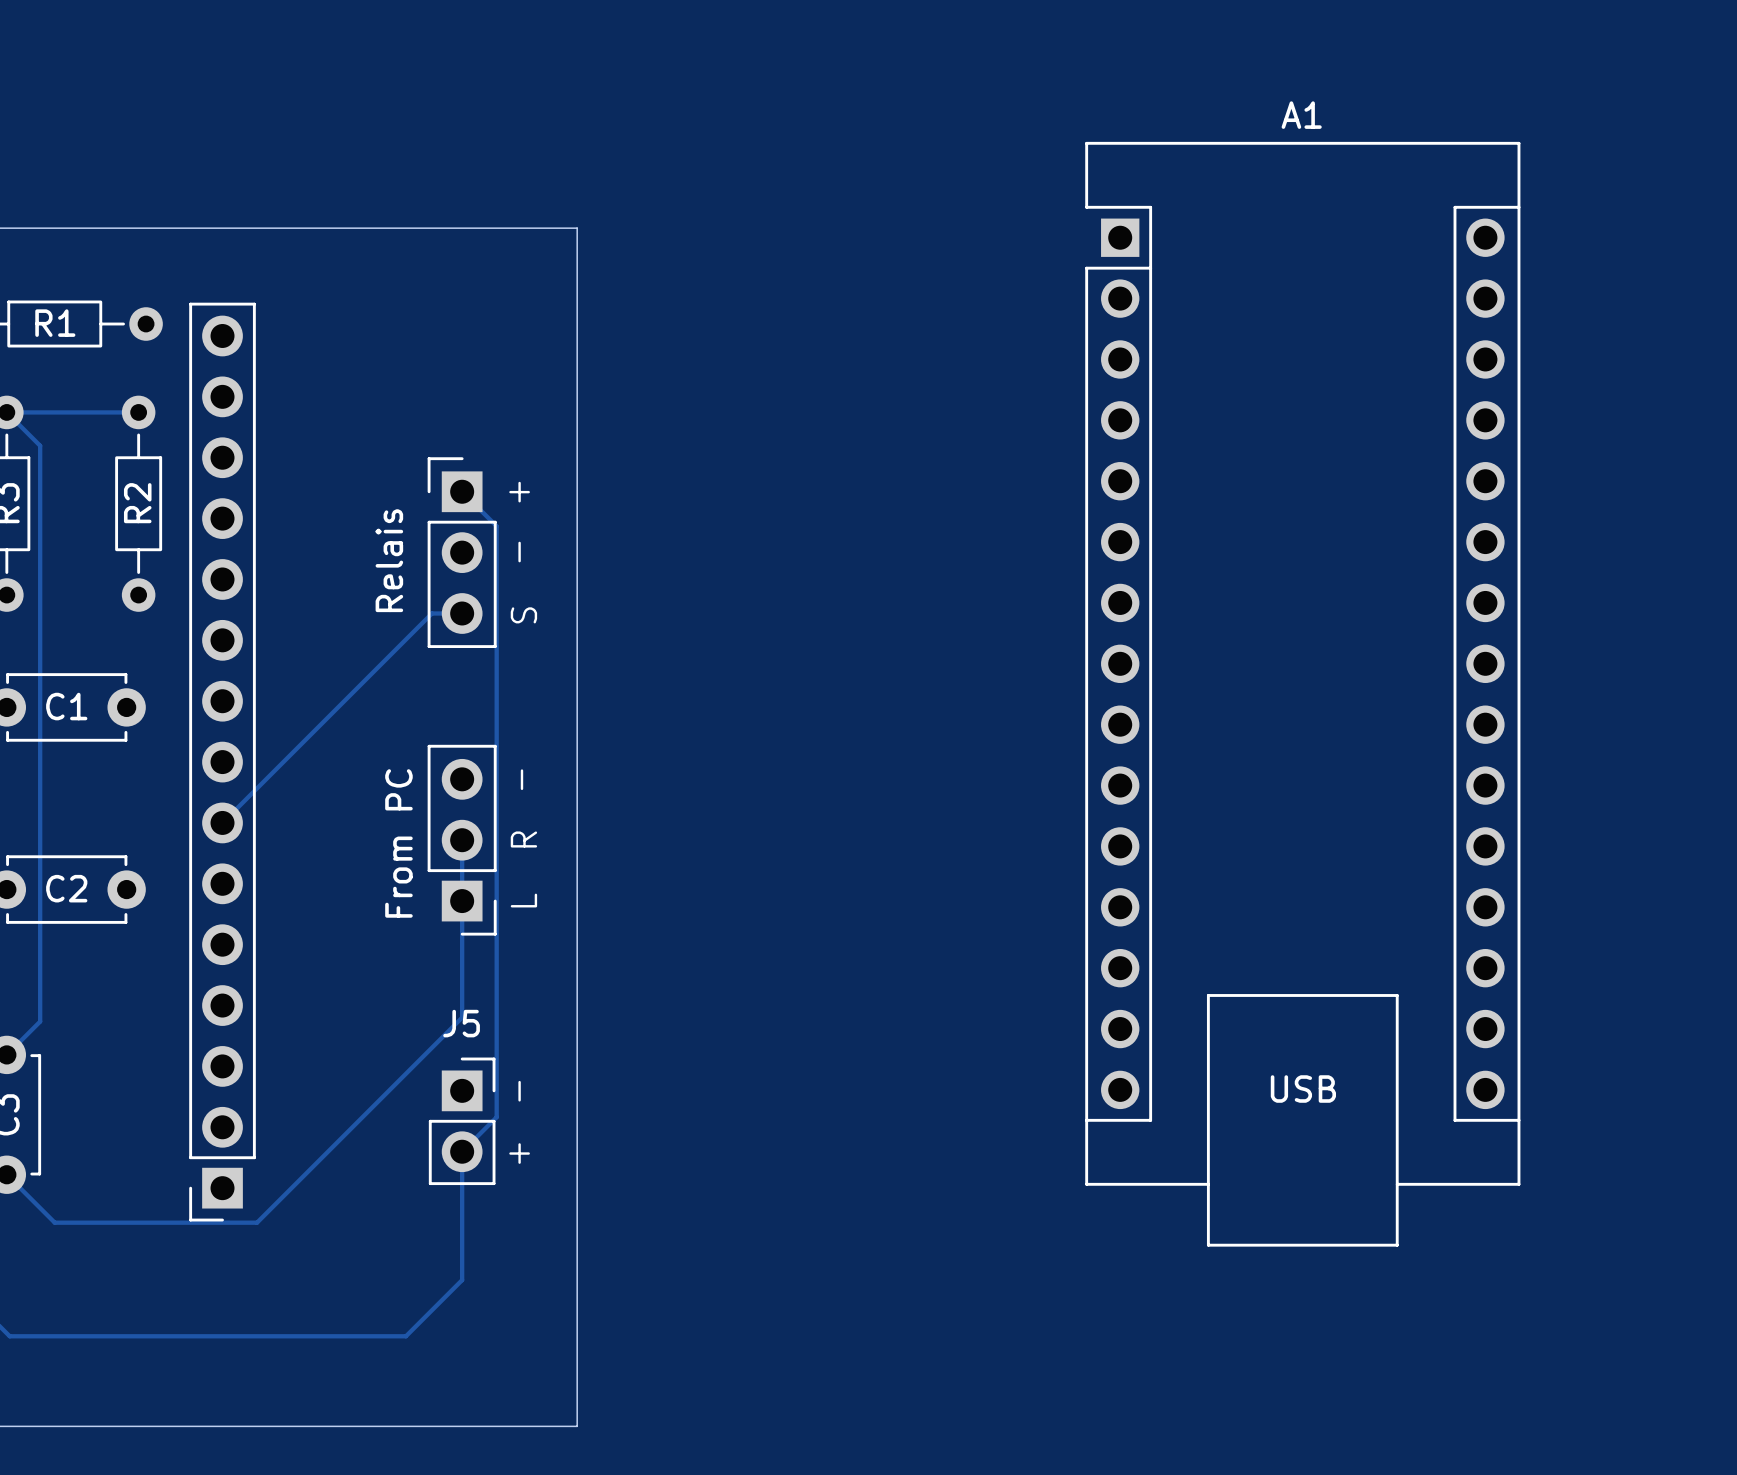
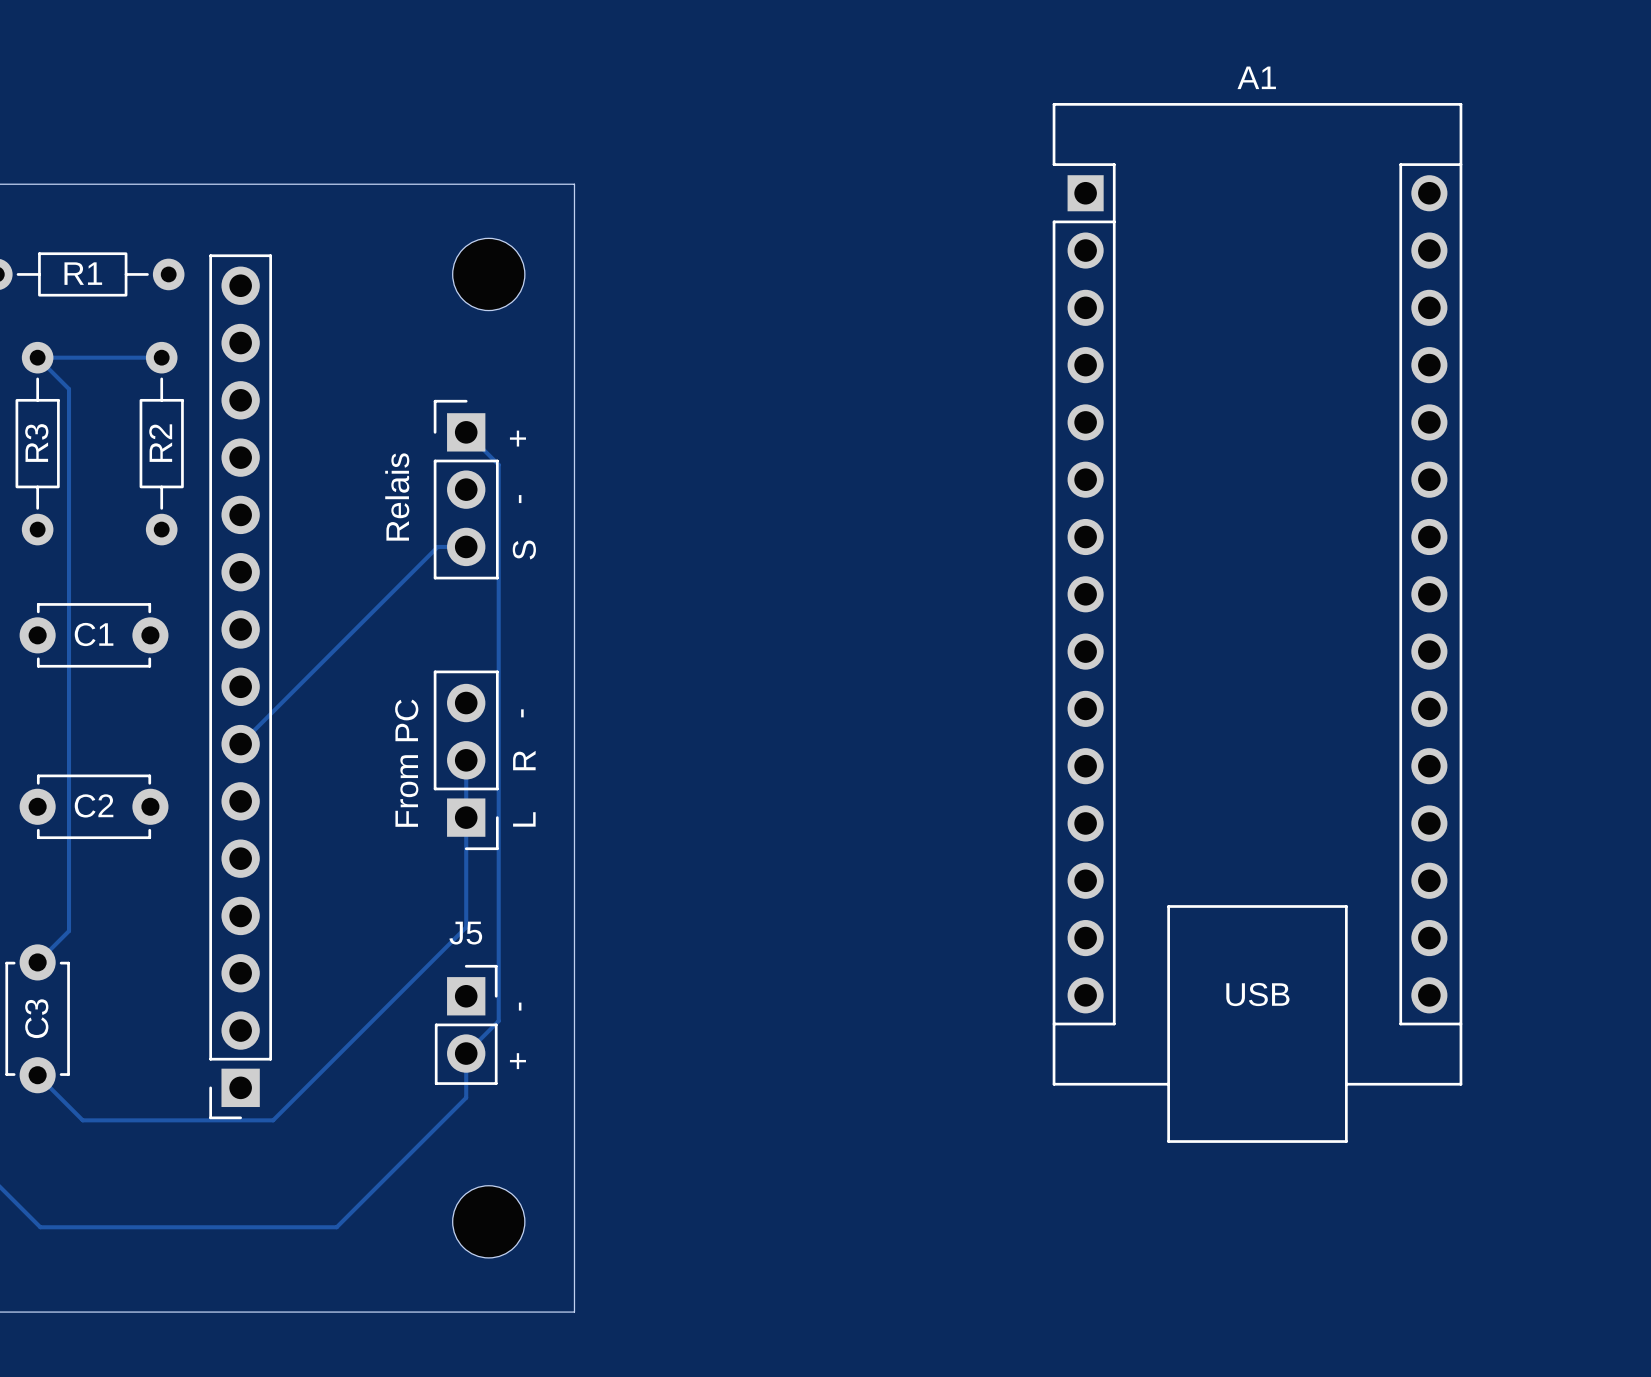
part: none -> (488, 274)
track: (462, 1198) (462, 1280) (405, 1336) (324, 1336) -> (466, 1097) (336, 1227)
part: none -> (488, 1221)

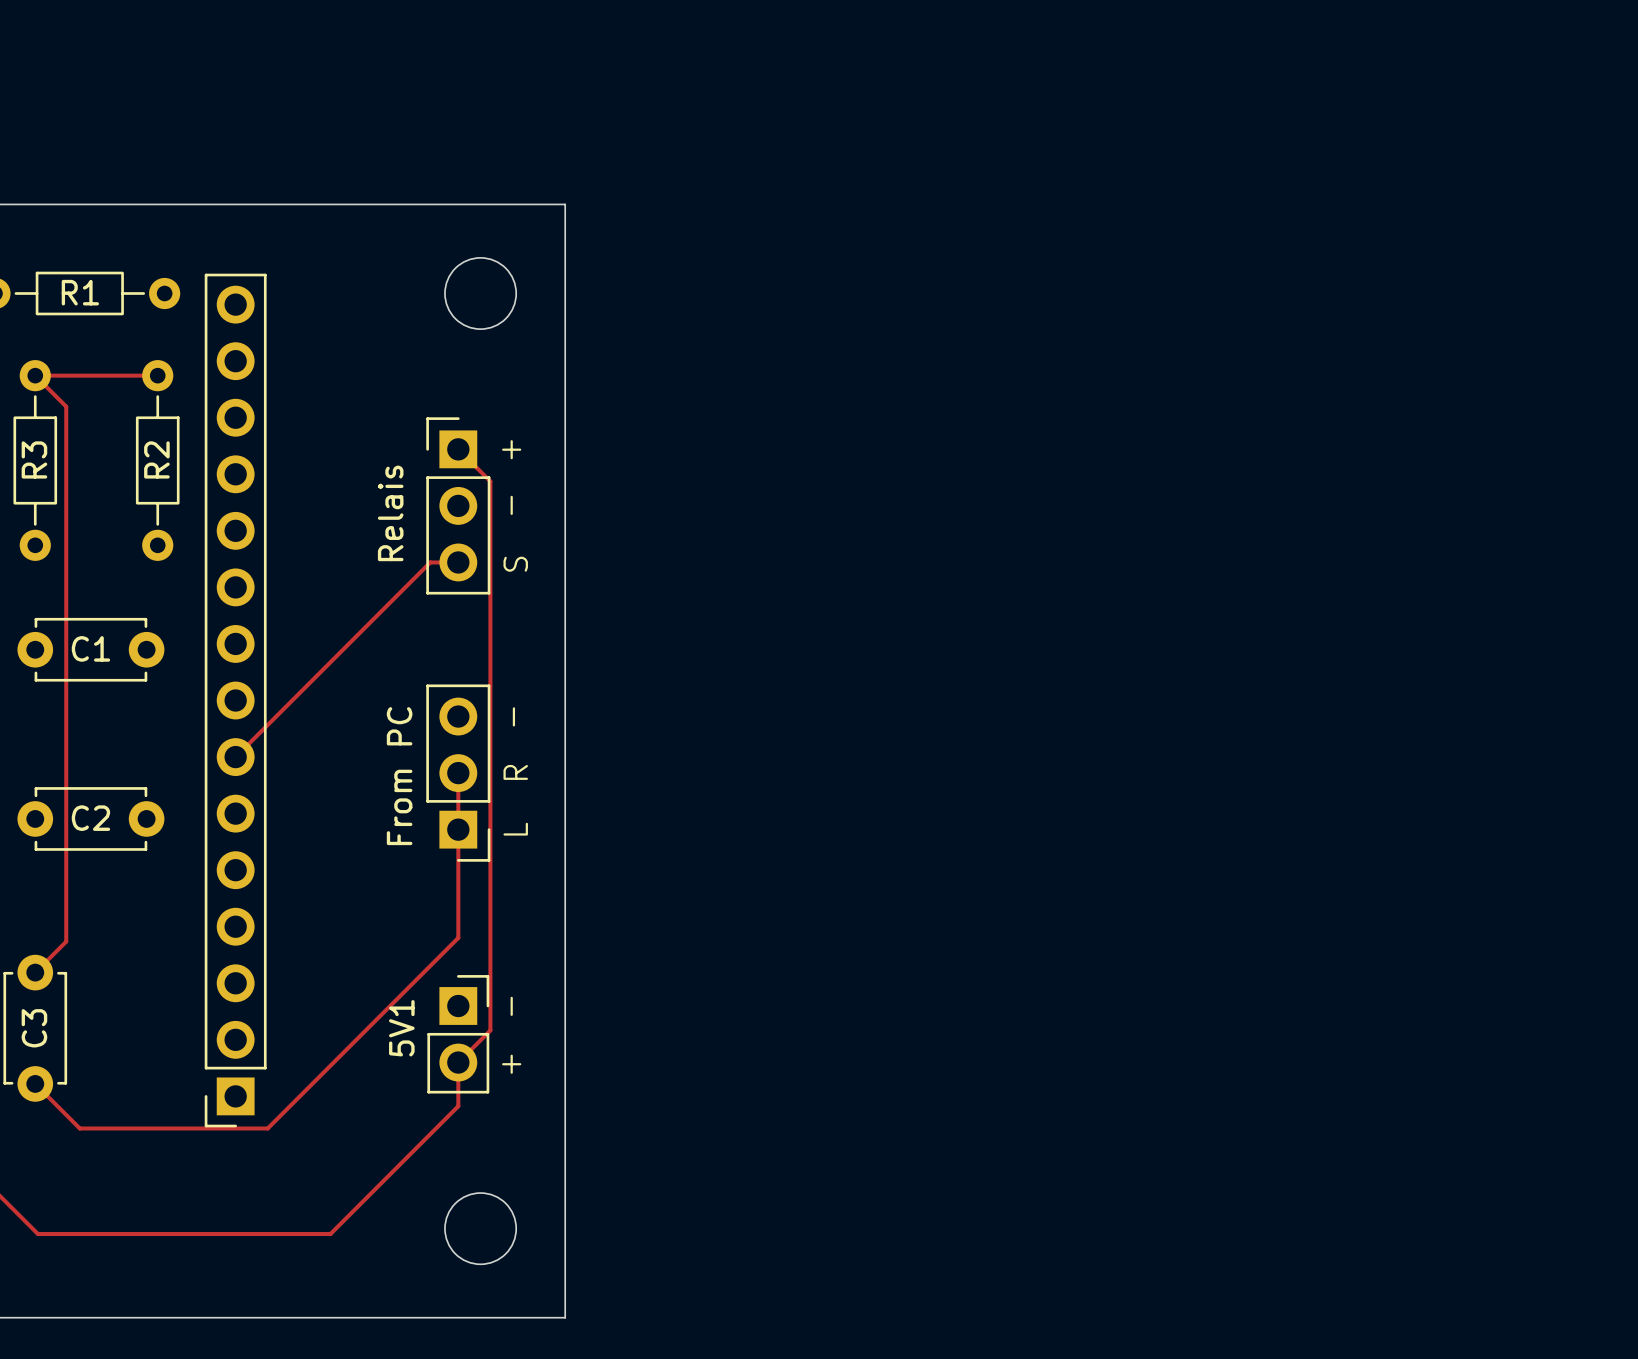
A1: (1257, 622) -> none
J5 name: J5 (465, 933) -> 5V1 (401, 1028)

